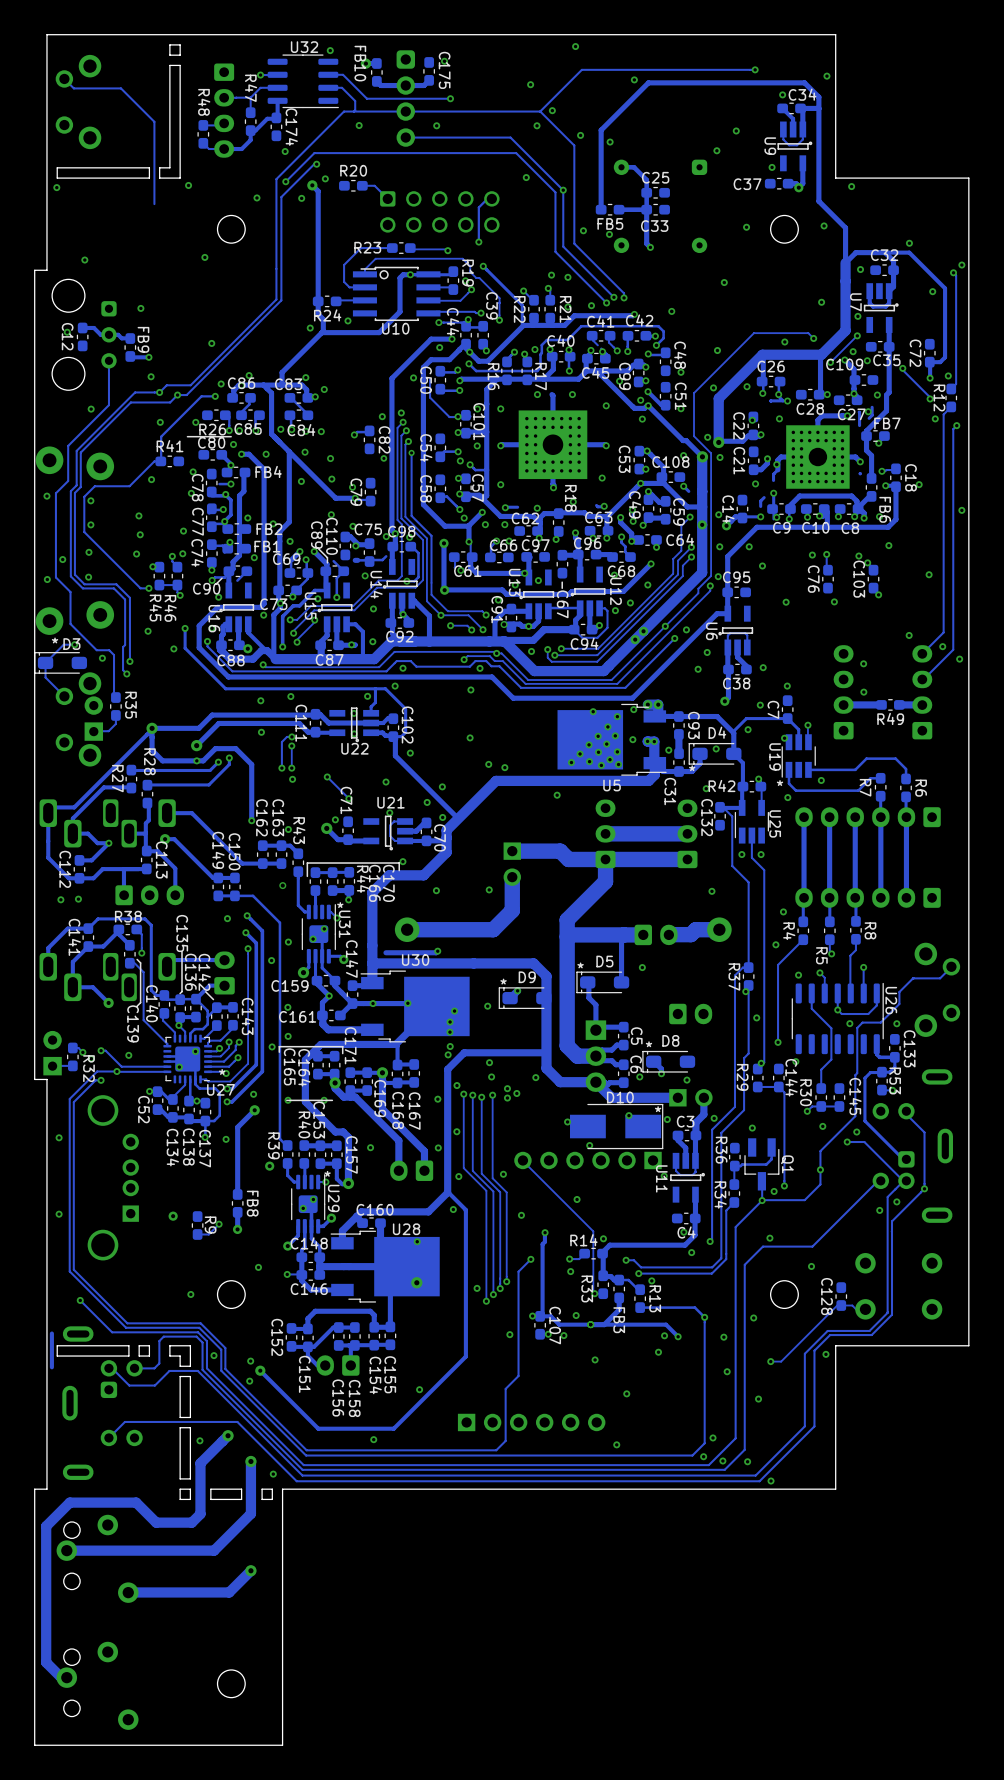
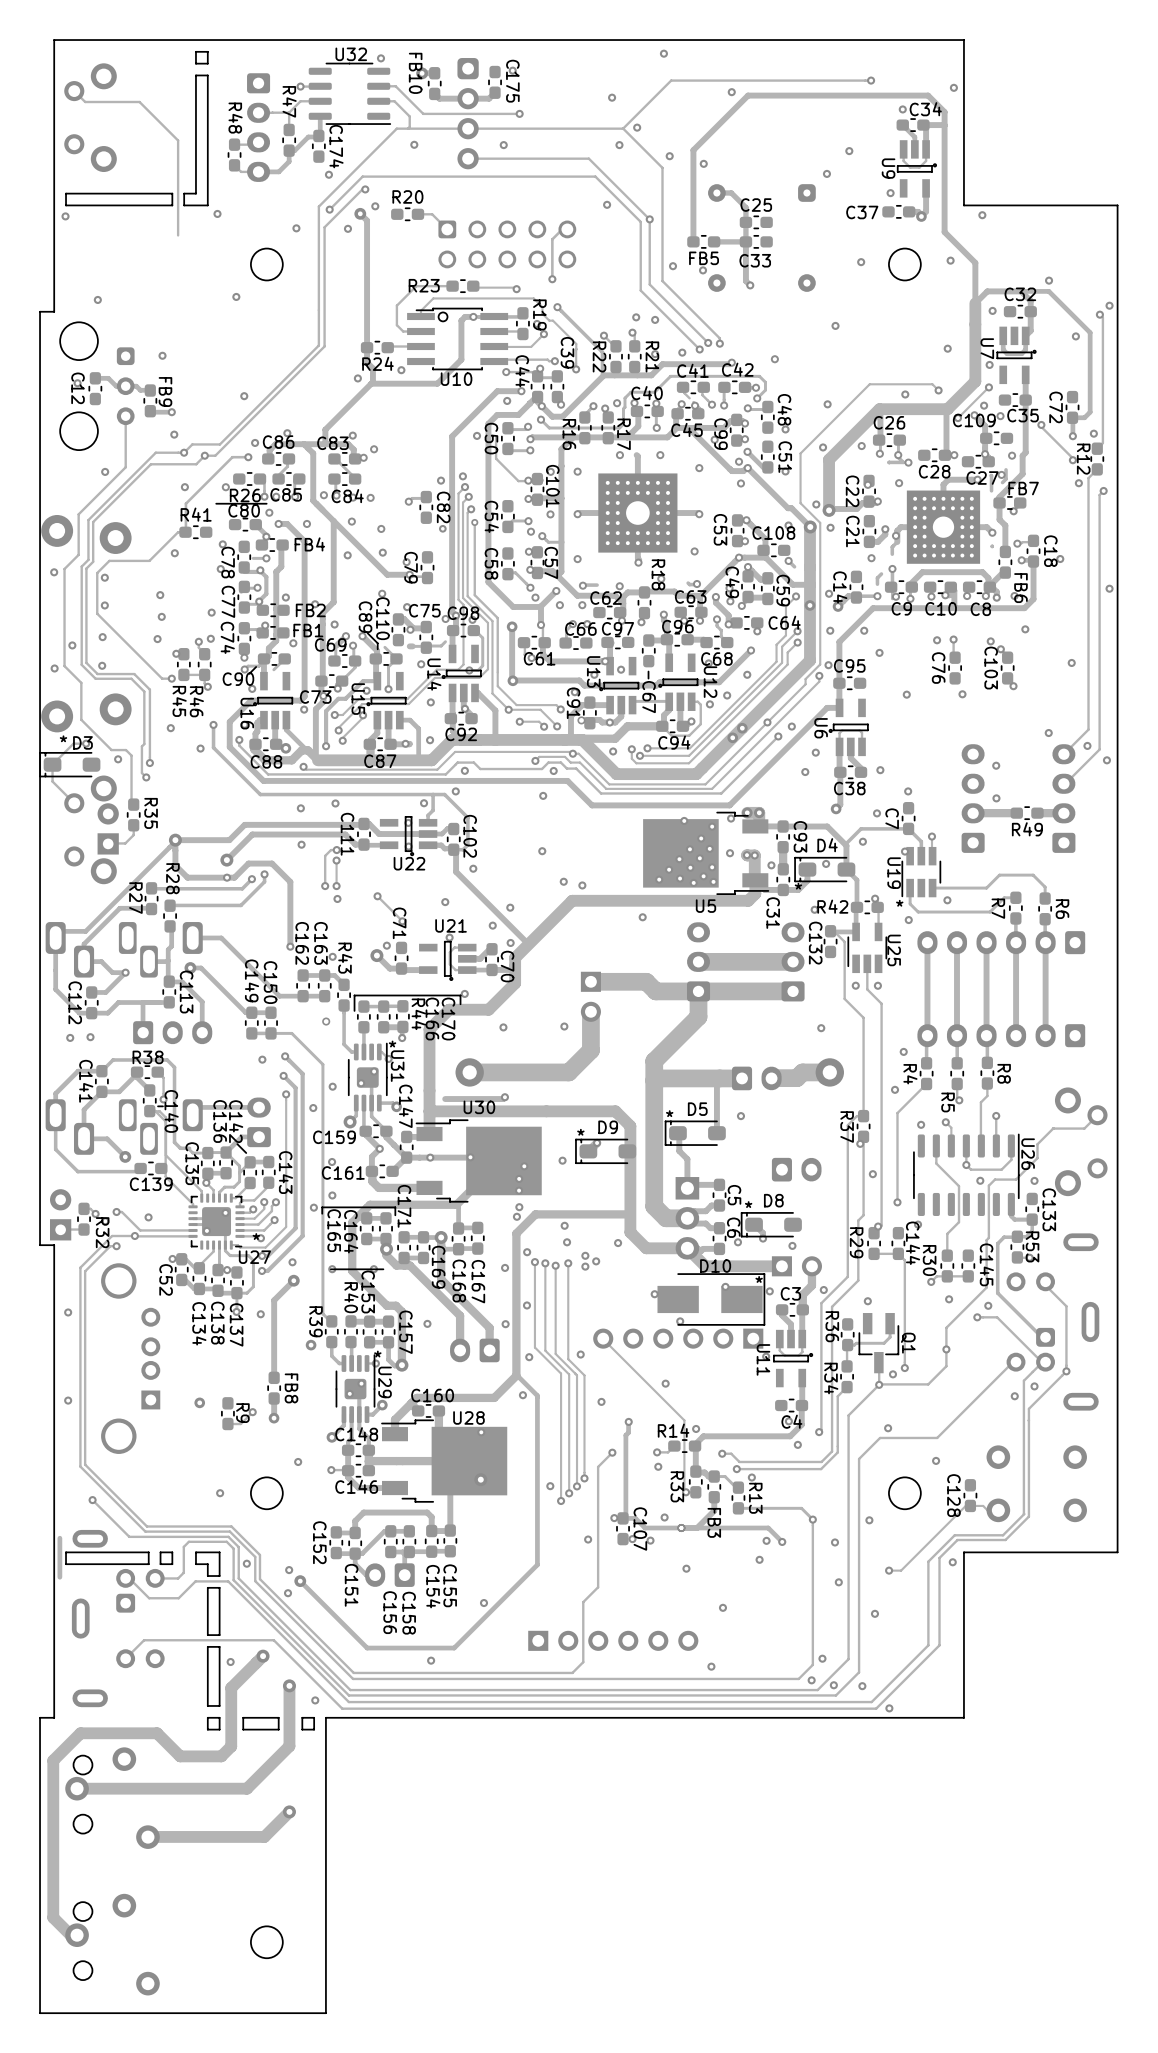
C135 name position: C135 (182, 933) -> C135 (192, 1163)
line: (181, 952) (181, 991) (180, 993) -> none
line: (137, 959) (140, 962) (140, 1002) (137, 1006) -> (158, 1106) (162, 1106)
track: none -> (55, 1115) (55, 1149) (77, 1171) (137, 1171) (140, 1168)
C140: (164, 1004) -> none
C139: none -> (150, 1168)
track: (163, 1013) (163, 1020) (174, 1032) -> (151, 1111) (159, 1111) (165, 1117) (165, 1155) (201, 1191)
C139 name: C139 (133, 1023) -> C140 (171, 1111)

